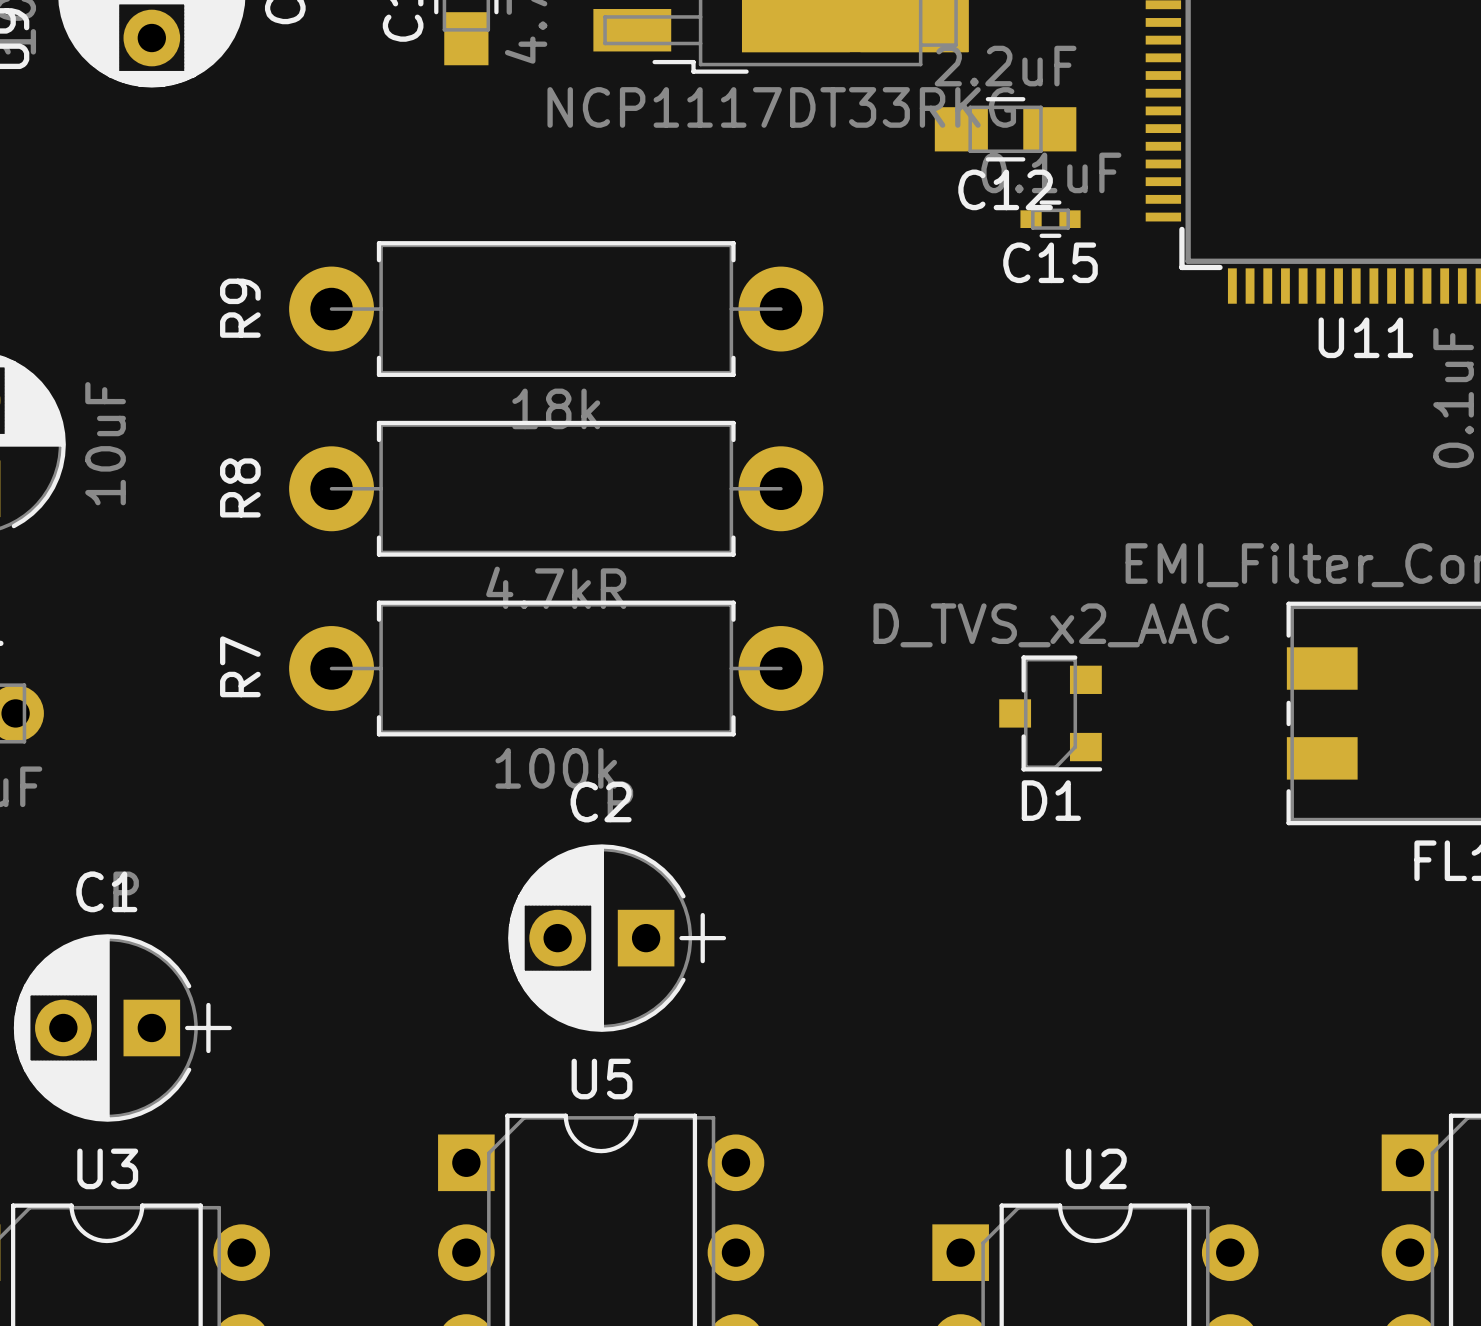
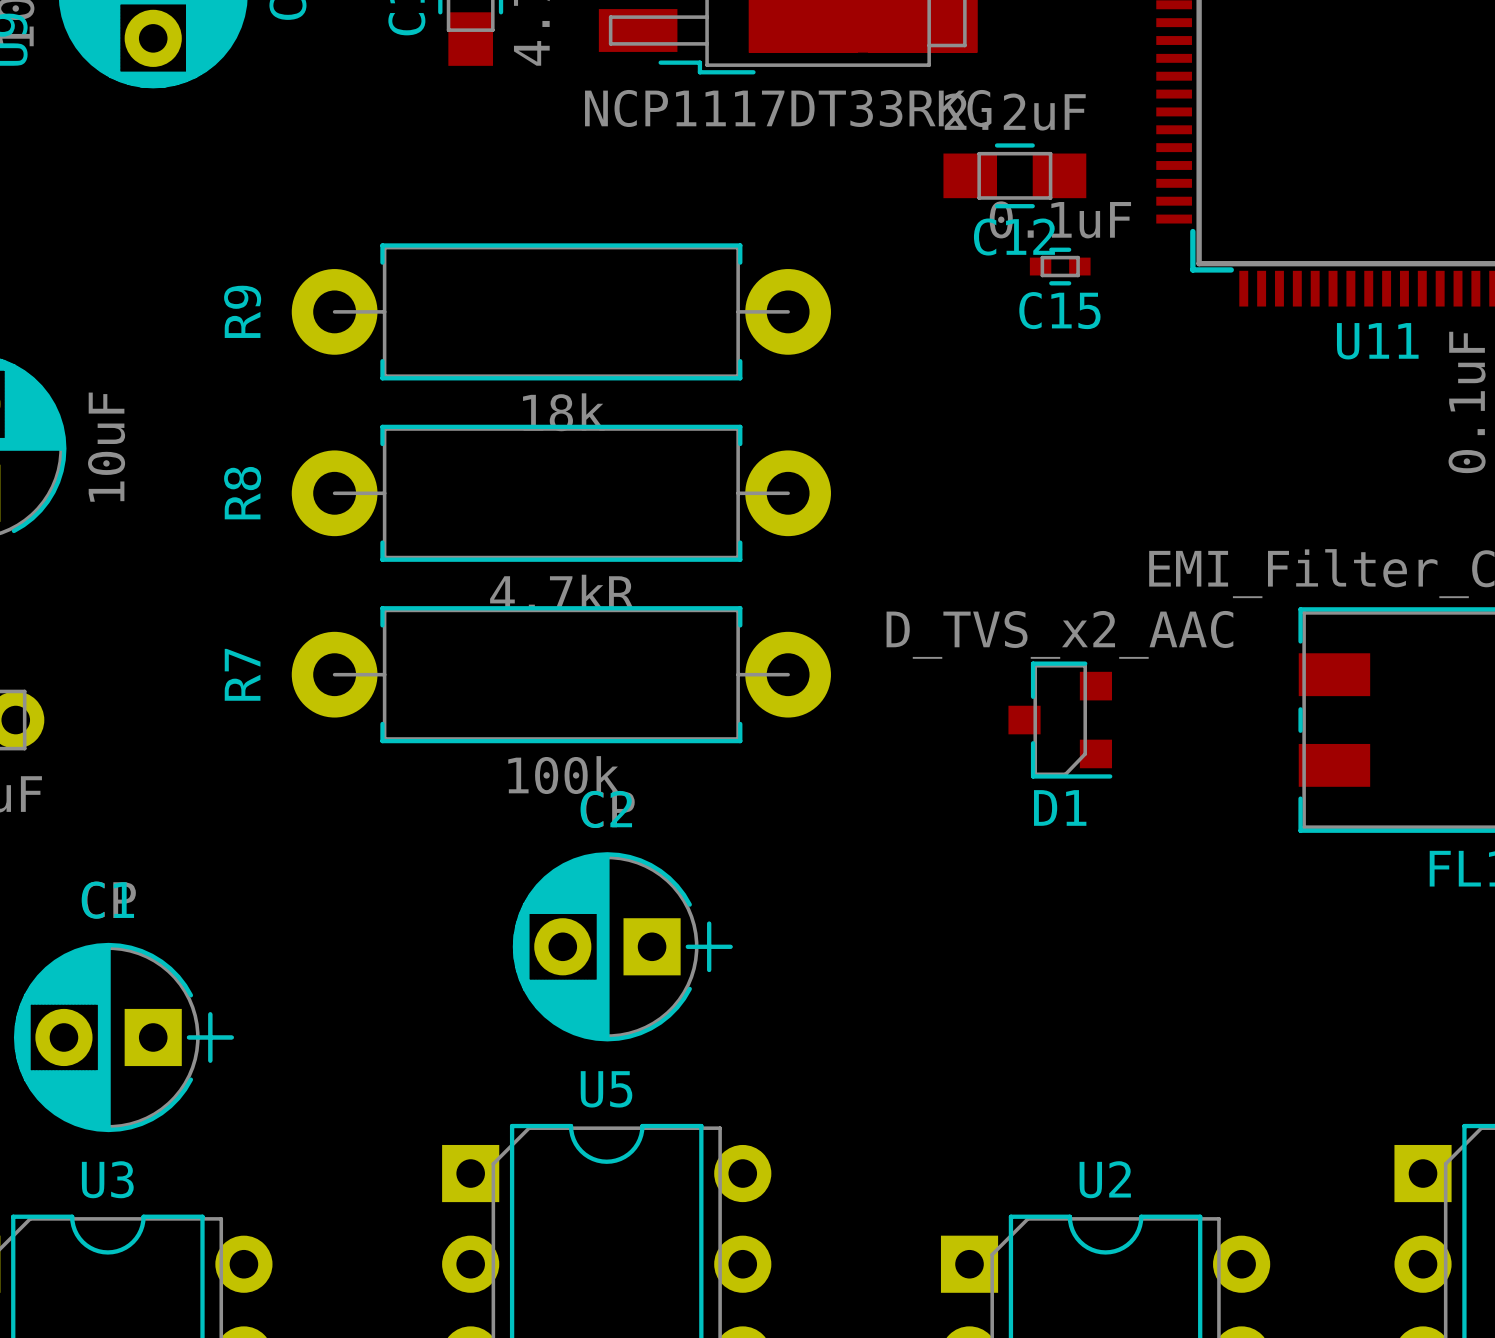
C12 position: (1005, 129) -> (1014, 175)
C15 position: (1050, 219) -> (1060, 266)

